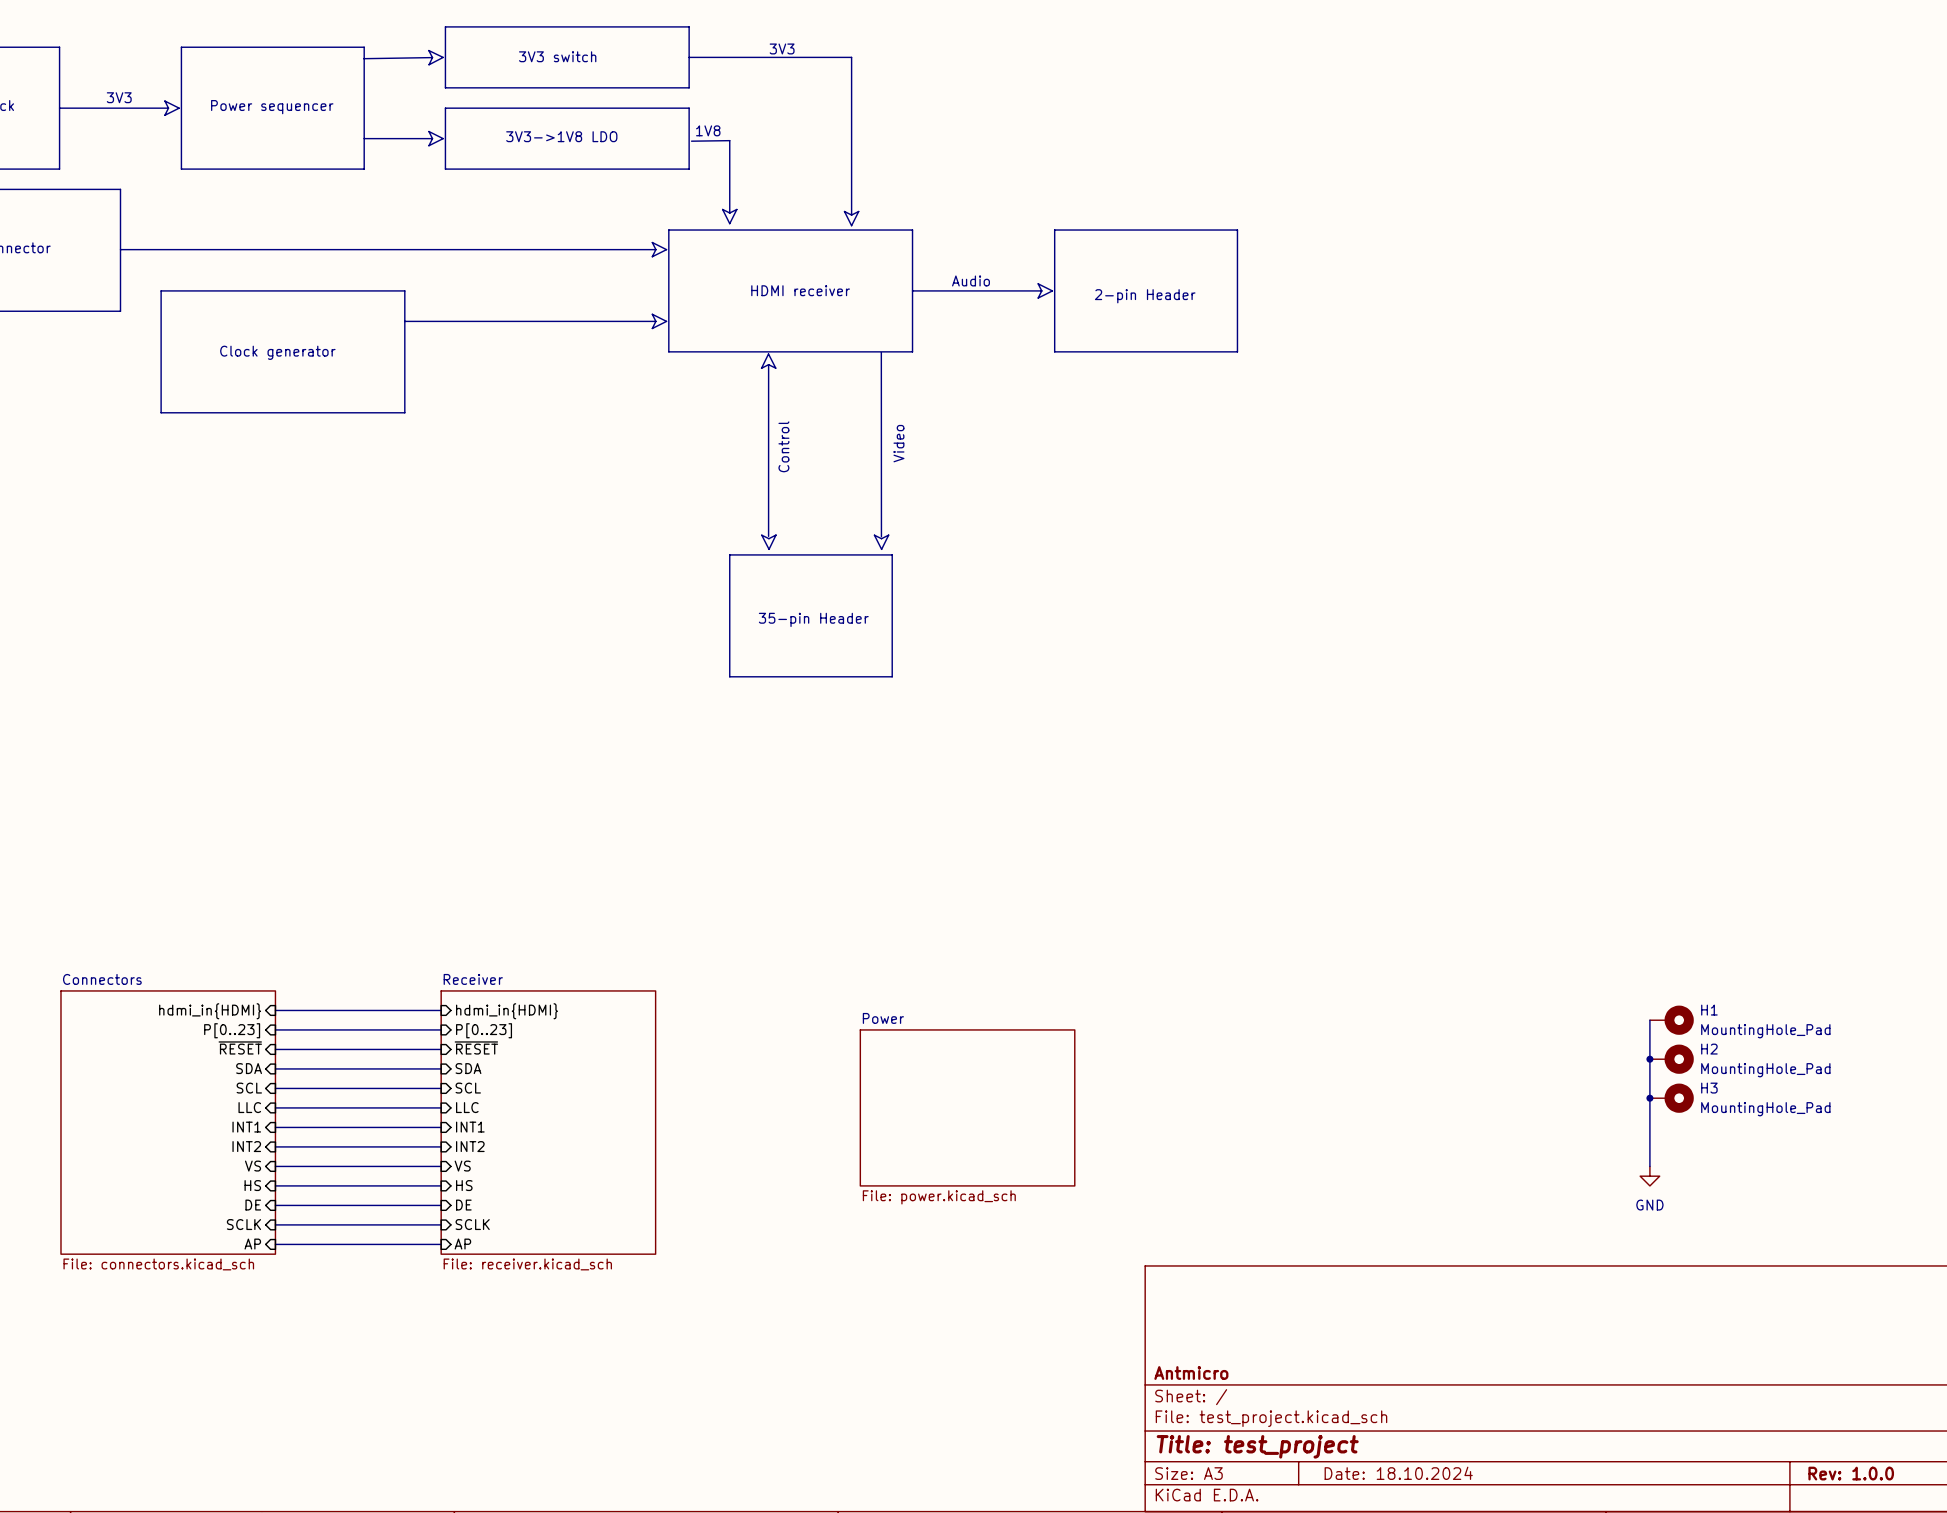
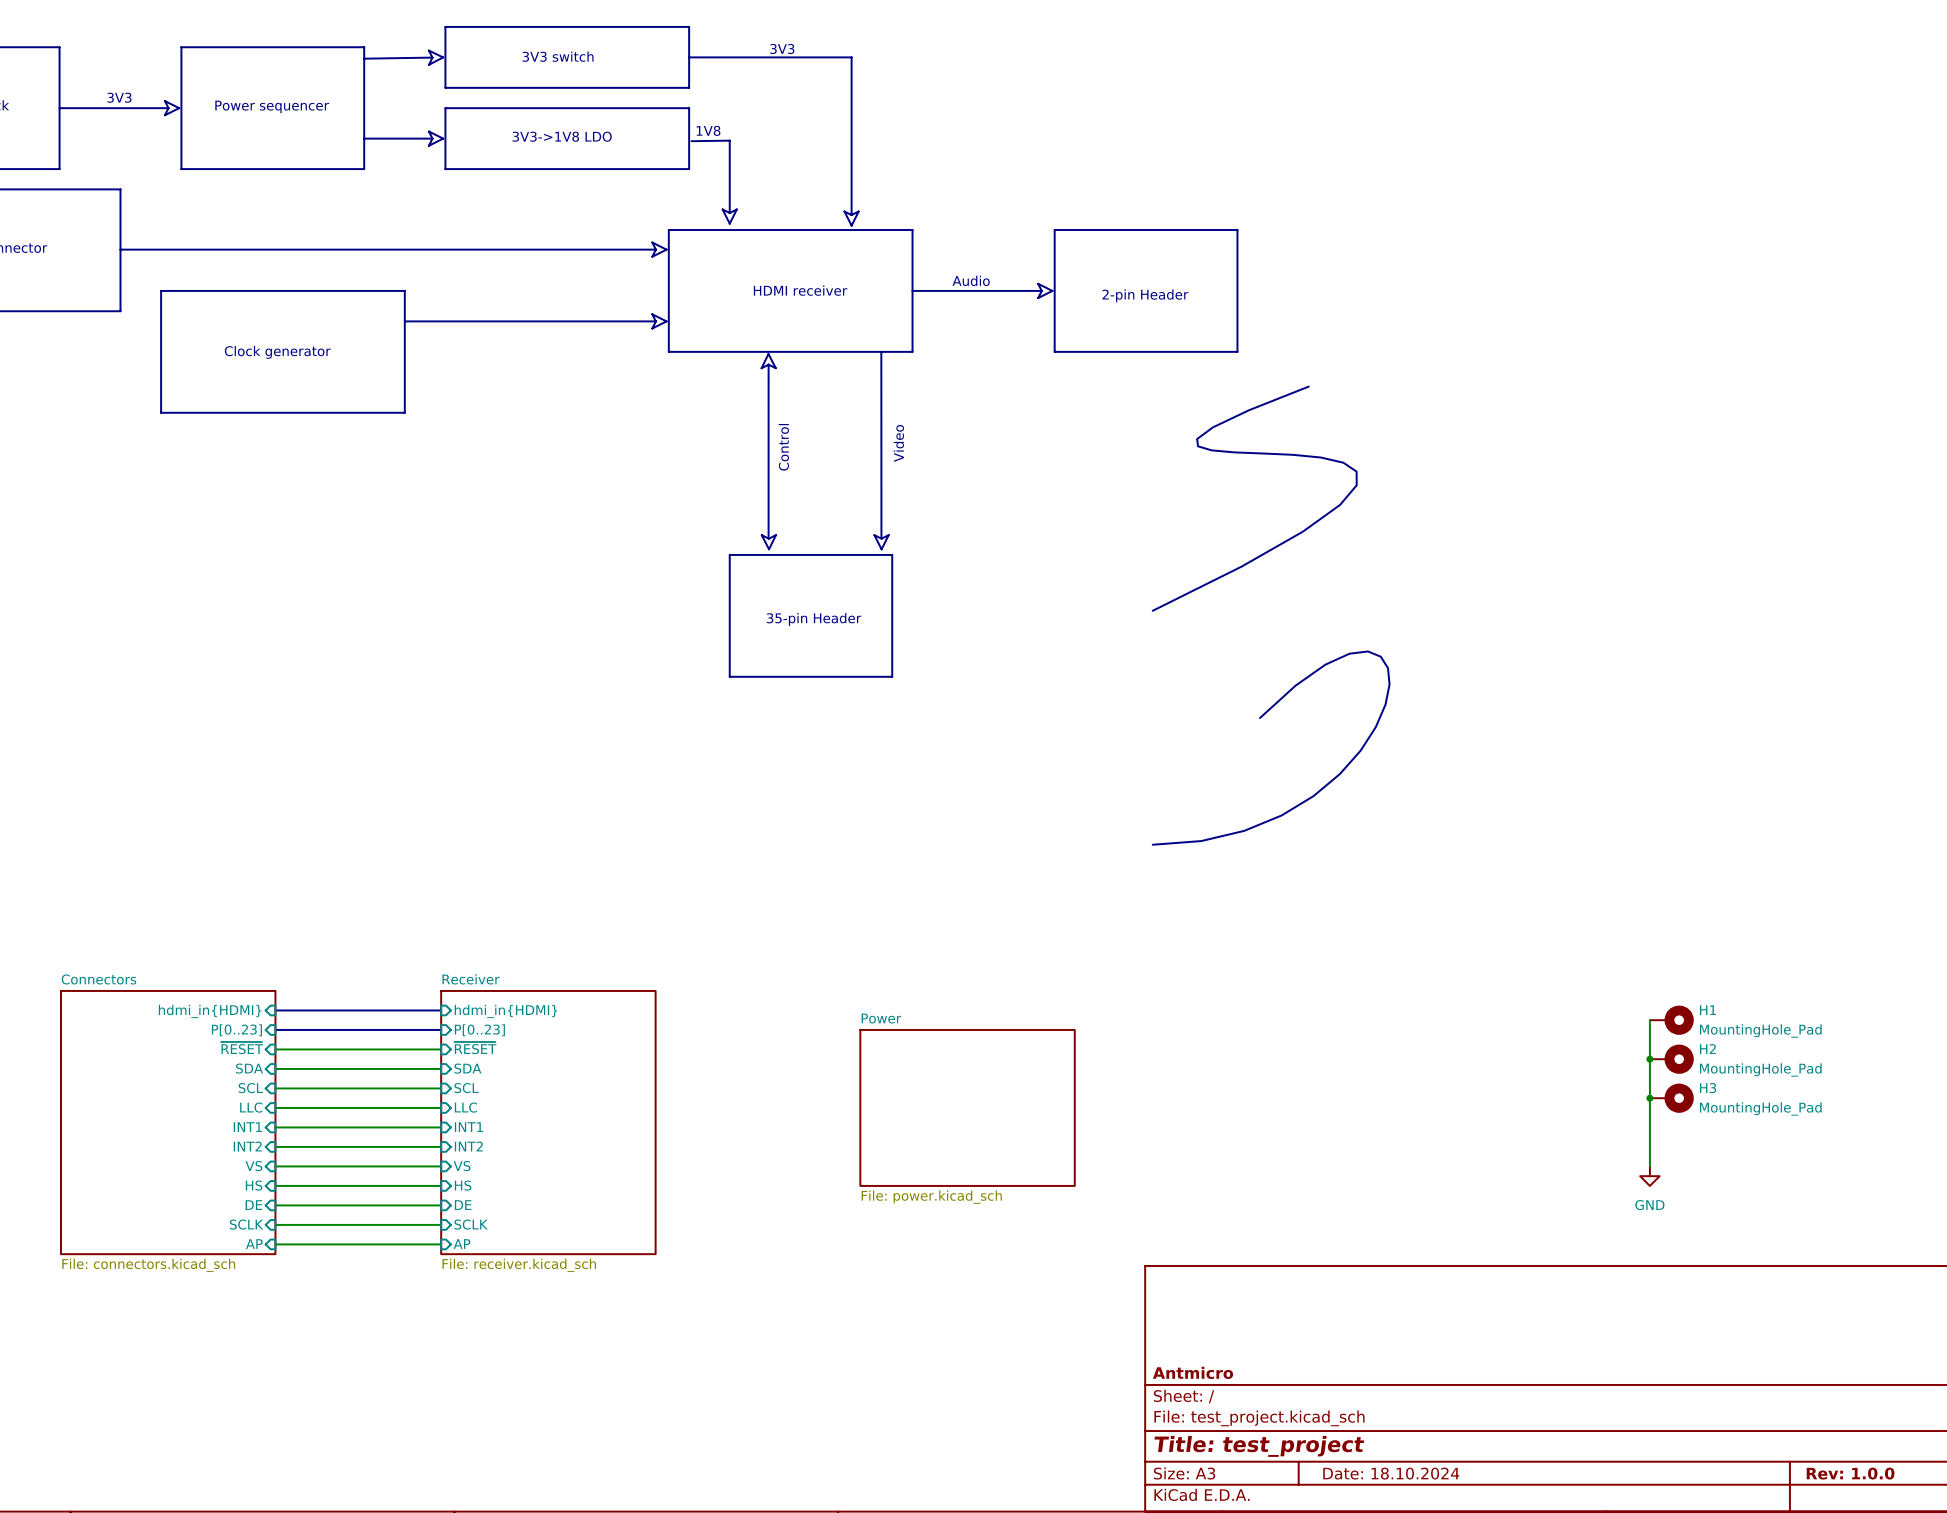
line: none -> (1308, 386) (1248, 410) (1212, 427) (1197, 439) (1198, 446) (1211, 450) (1321, 457) (1343, 462) (1356, 471) (1356, 485) (1340, 504) (1303, 531) (1241, 566) (1152, 610)
line: none -> (1260, 718) (1295, 685) (1325, 664) (1349, 653) (1367, 651) (1380, 656) (1388, 668) (1389, 684) (1385, 704) (1375, 727) (1360, 750) (1339, 774) (1313, 796) (1281, 815) (1244, 830) (1201, 841) (1152, 844)

